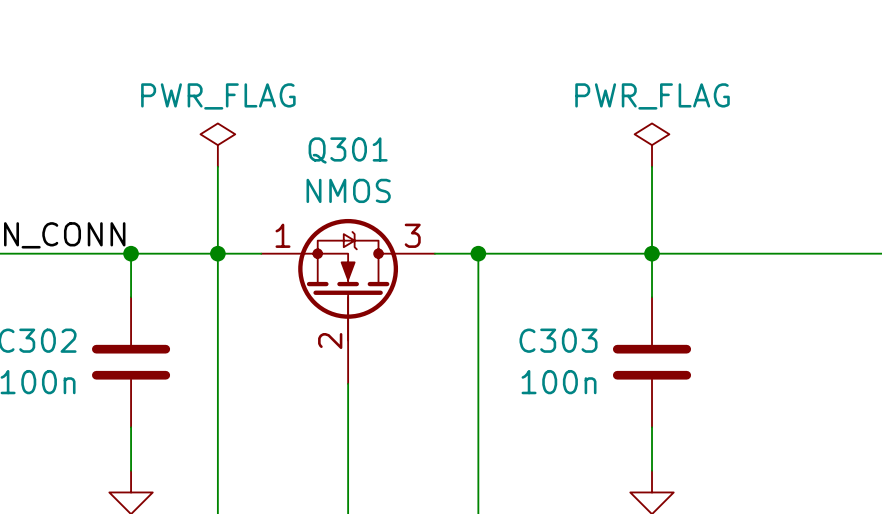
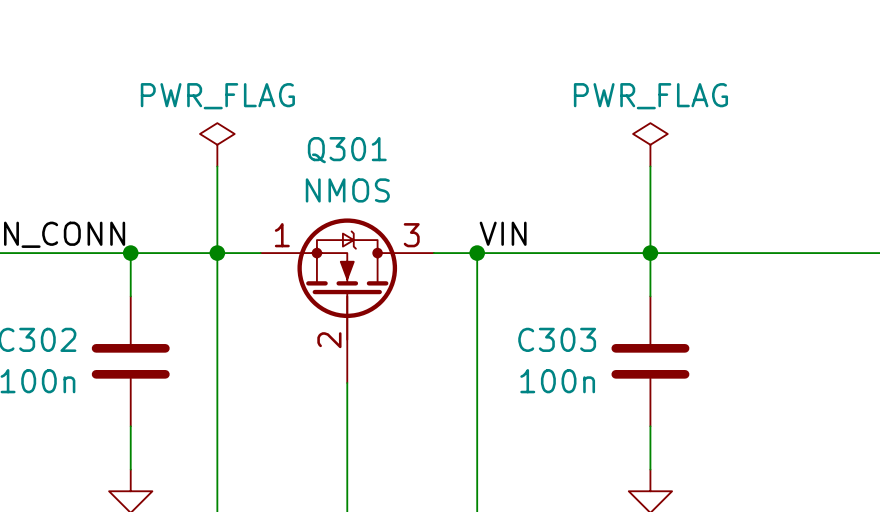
label: none -> VIN (503, 233)

